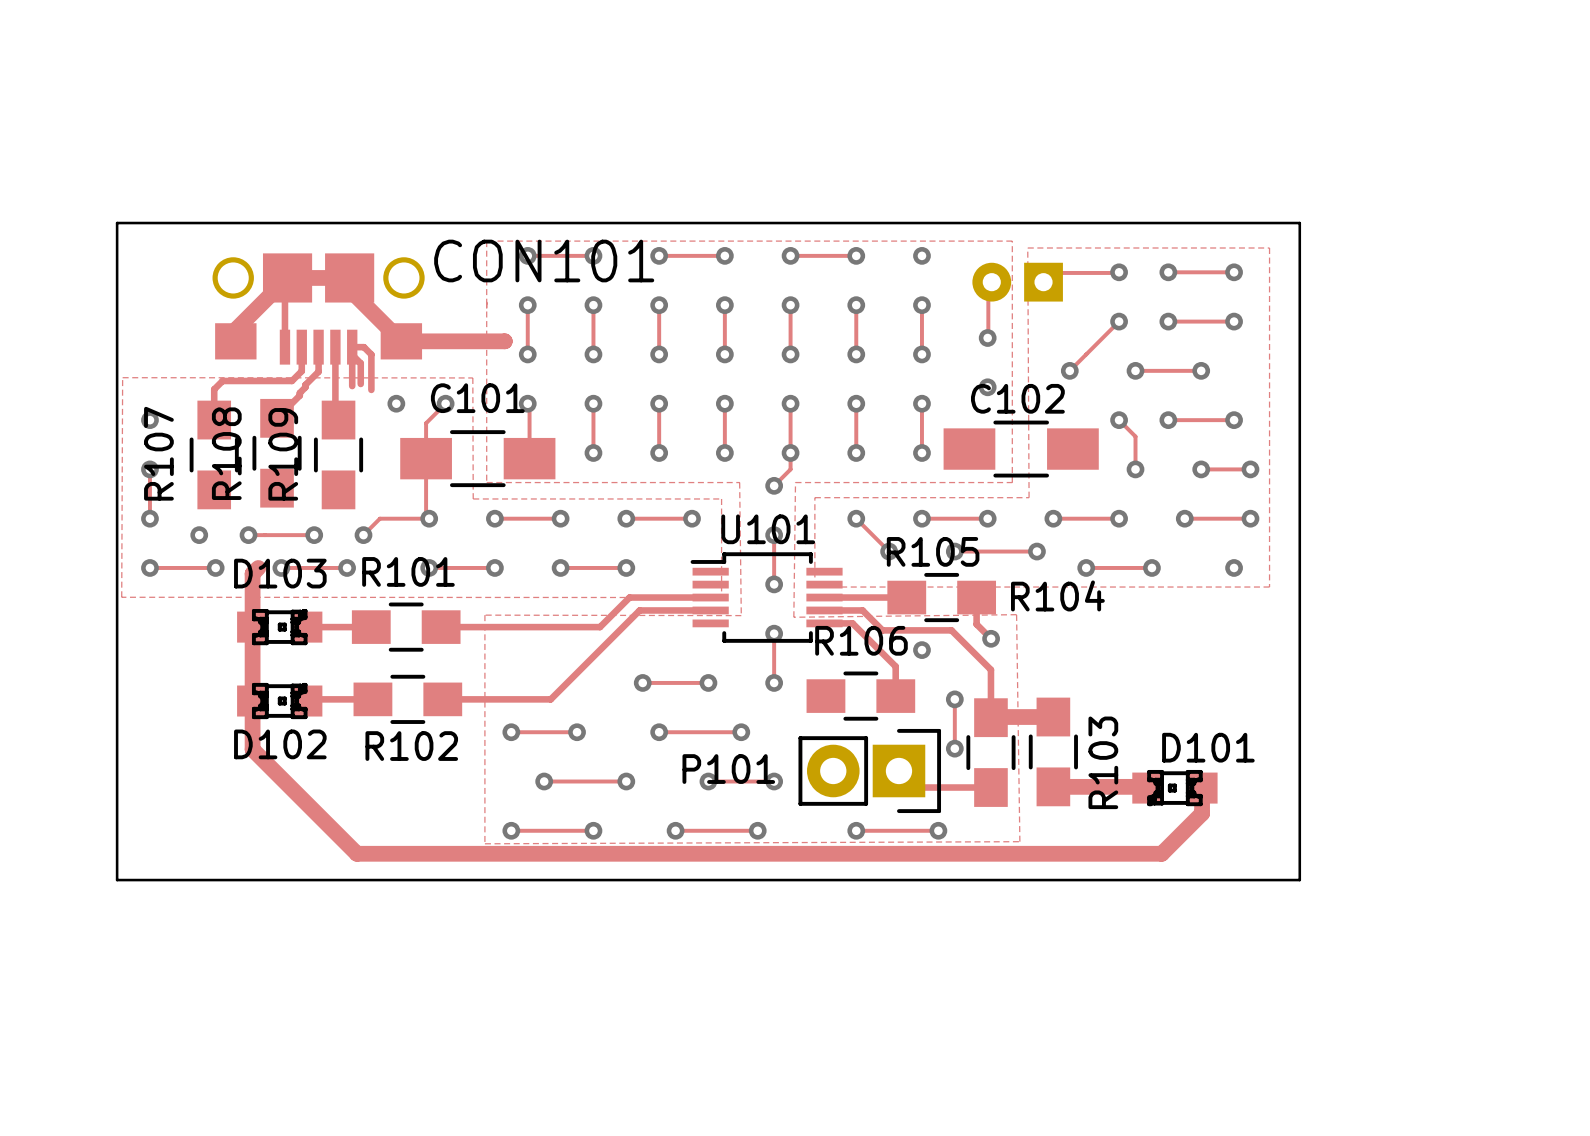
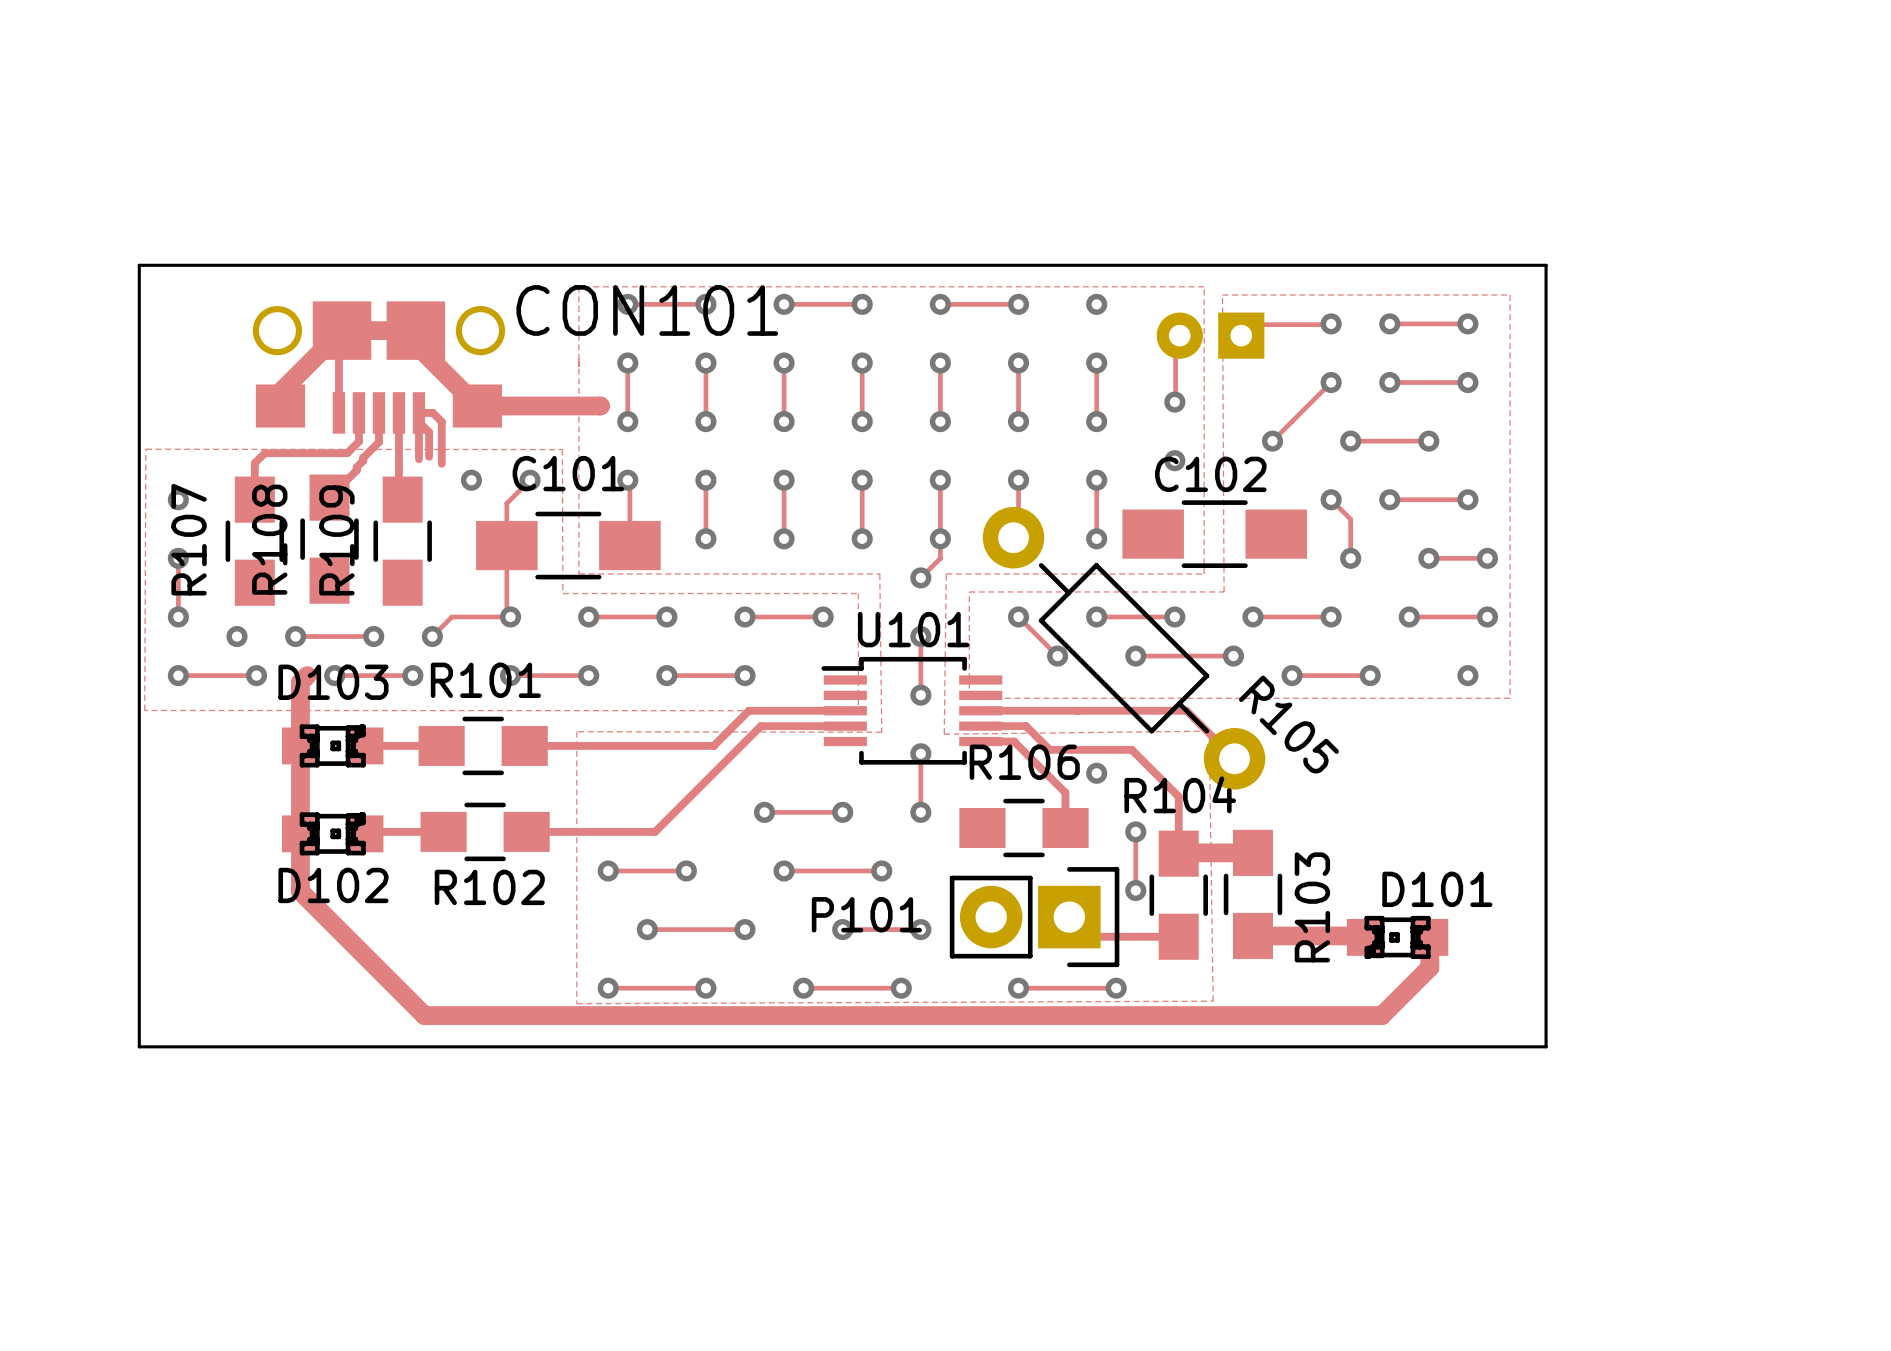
via: (856, 452) -> none
R105 name position: R105 (933, 551) -> R105 (1288, 724)
R105 footprint: [887, 572, 997, 623] -> [982, 506, 1266, 790]
R104 name position: R104 (1057, 595) -> R104 (1180, 794)
track: none -> (1078, 710) (1186, 710) (1234, 758)
track: (976, 597) (976, 624) (991, 638) -> none
via: (991, 638) -> none

